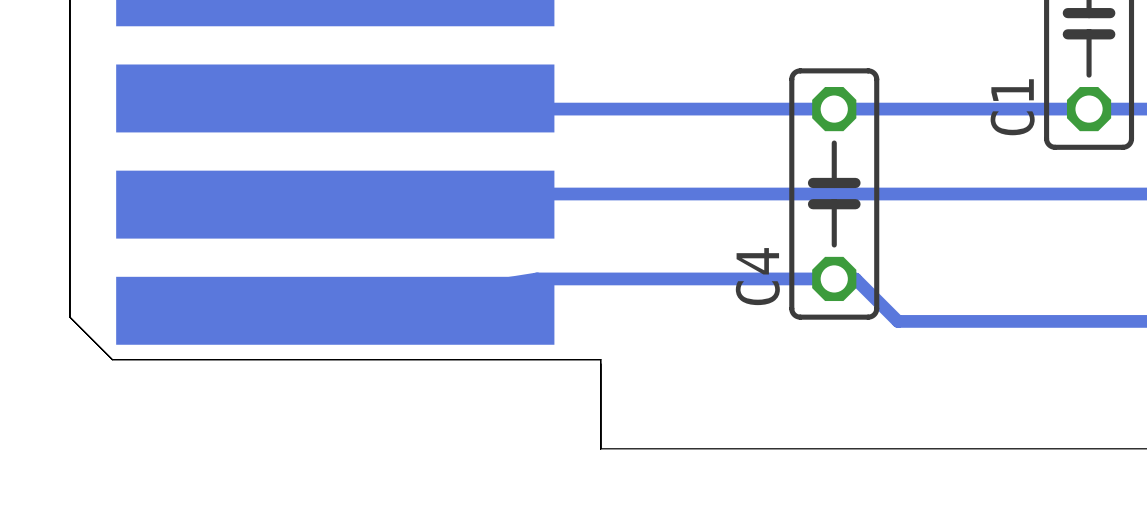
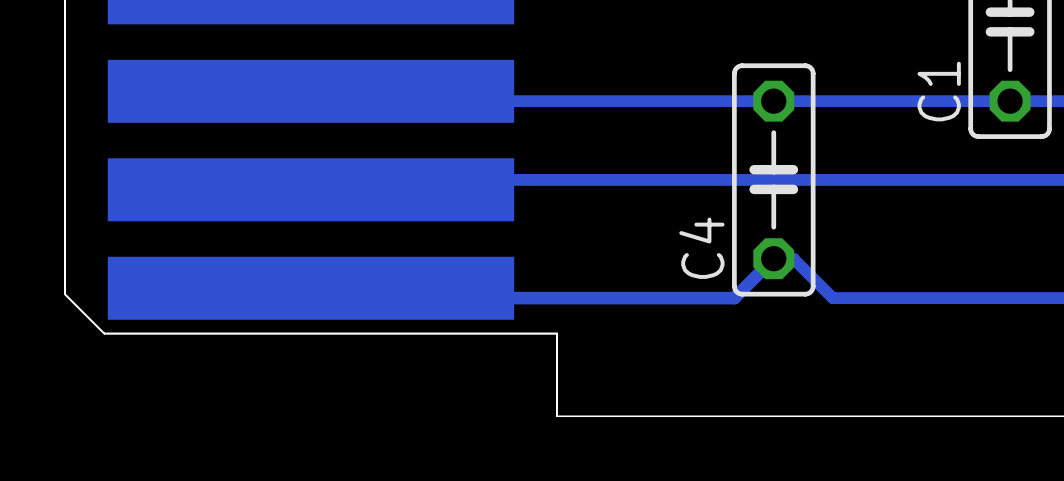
bottom track: (834, 278) (536, 278) (335, 310) -> (773, 258) (734, 298) (498, 298) (310, 288)

